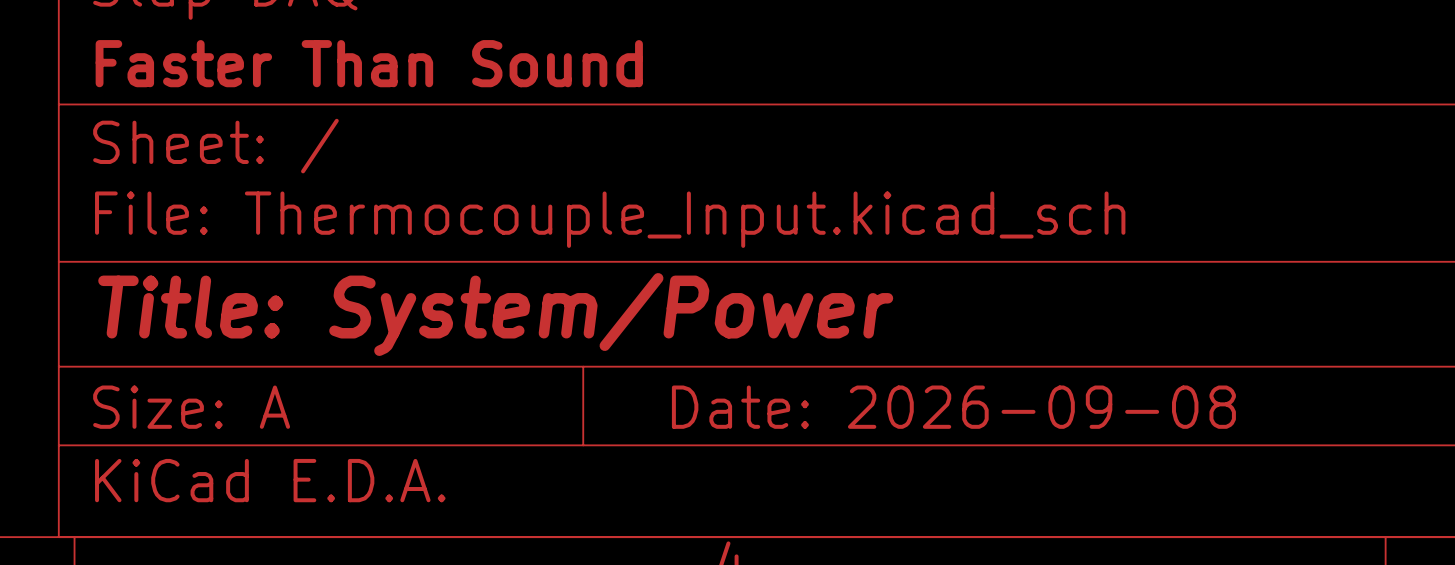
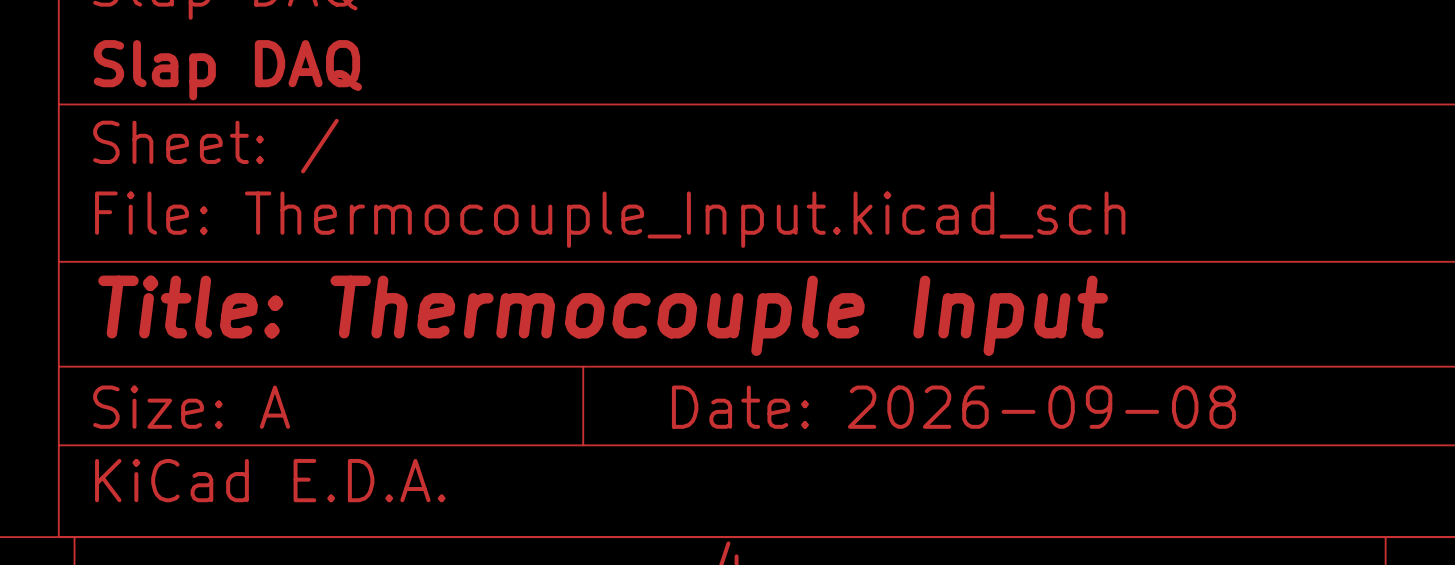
title block: Faster Than Sound (369, 63) -> Slap DAQ (227, 70)
title block: Title: System/Power (495, 314) -> Title: Thermocouple Input (603, 315)

